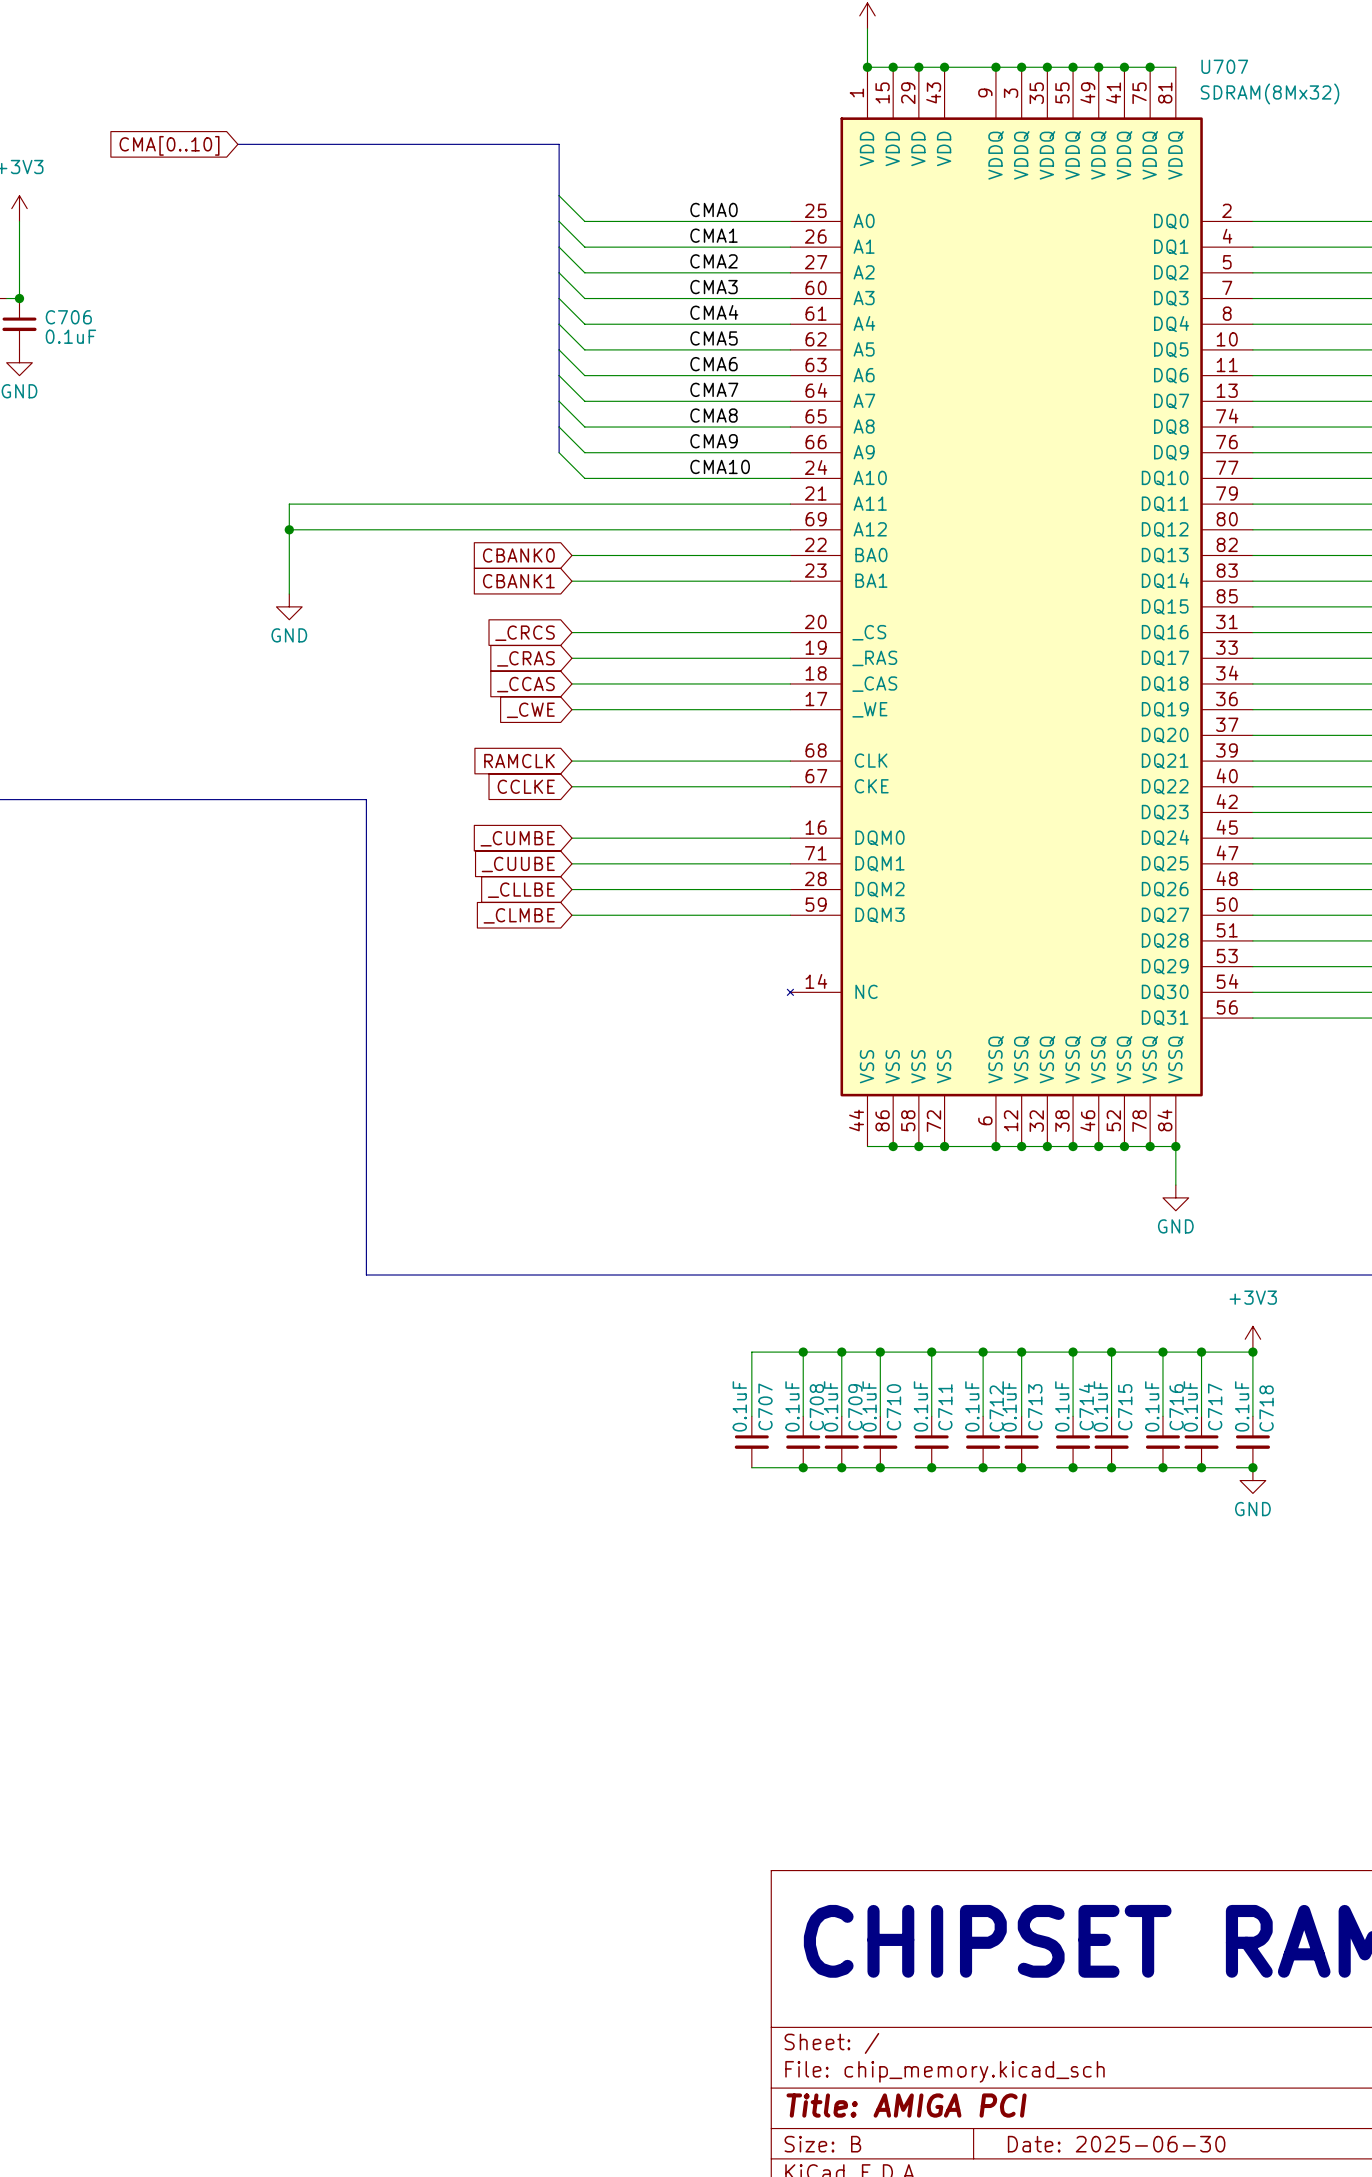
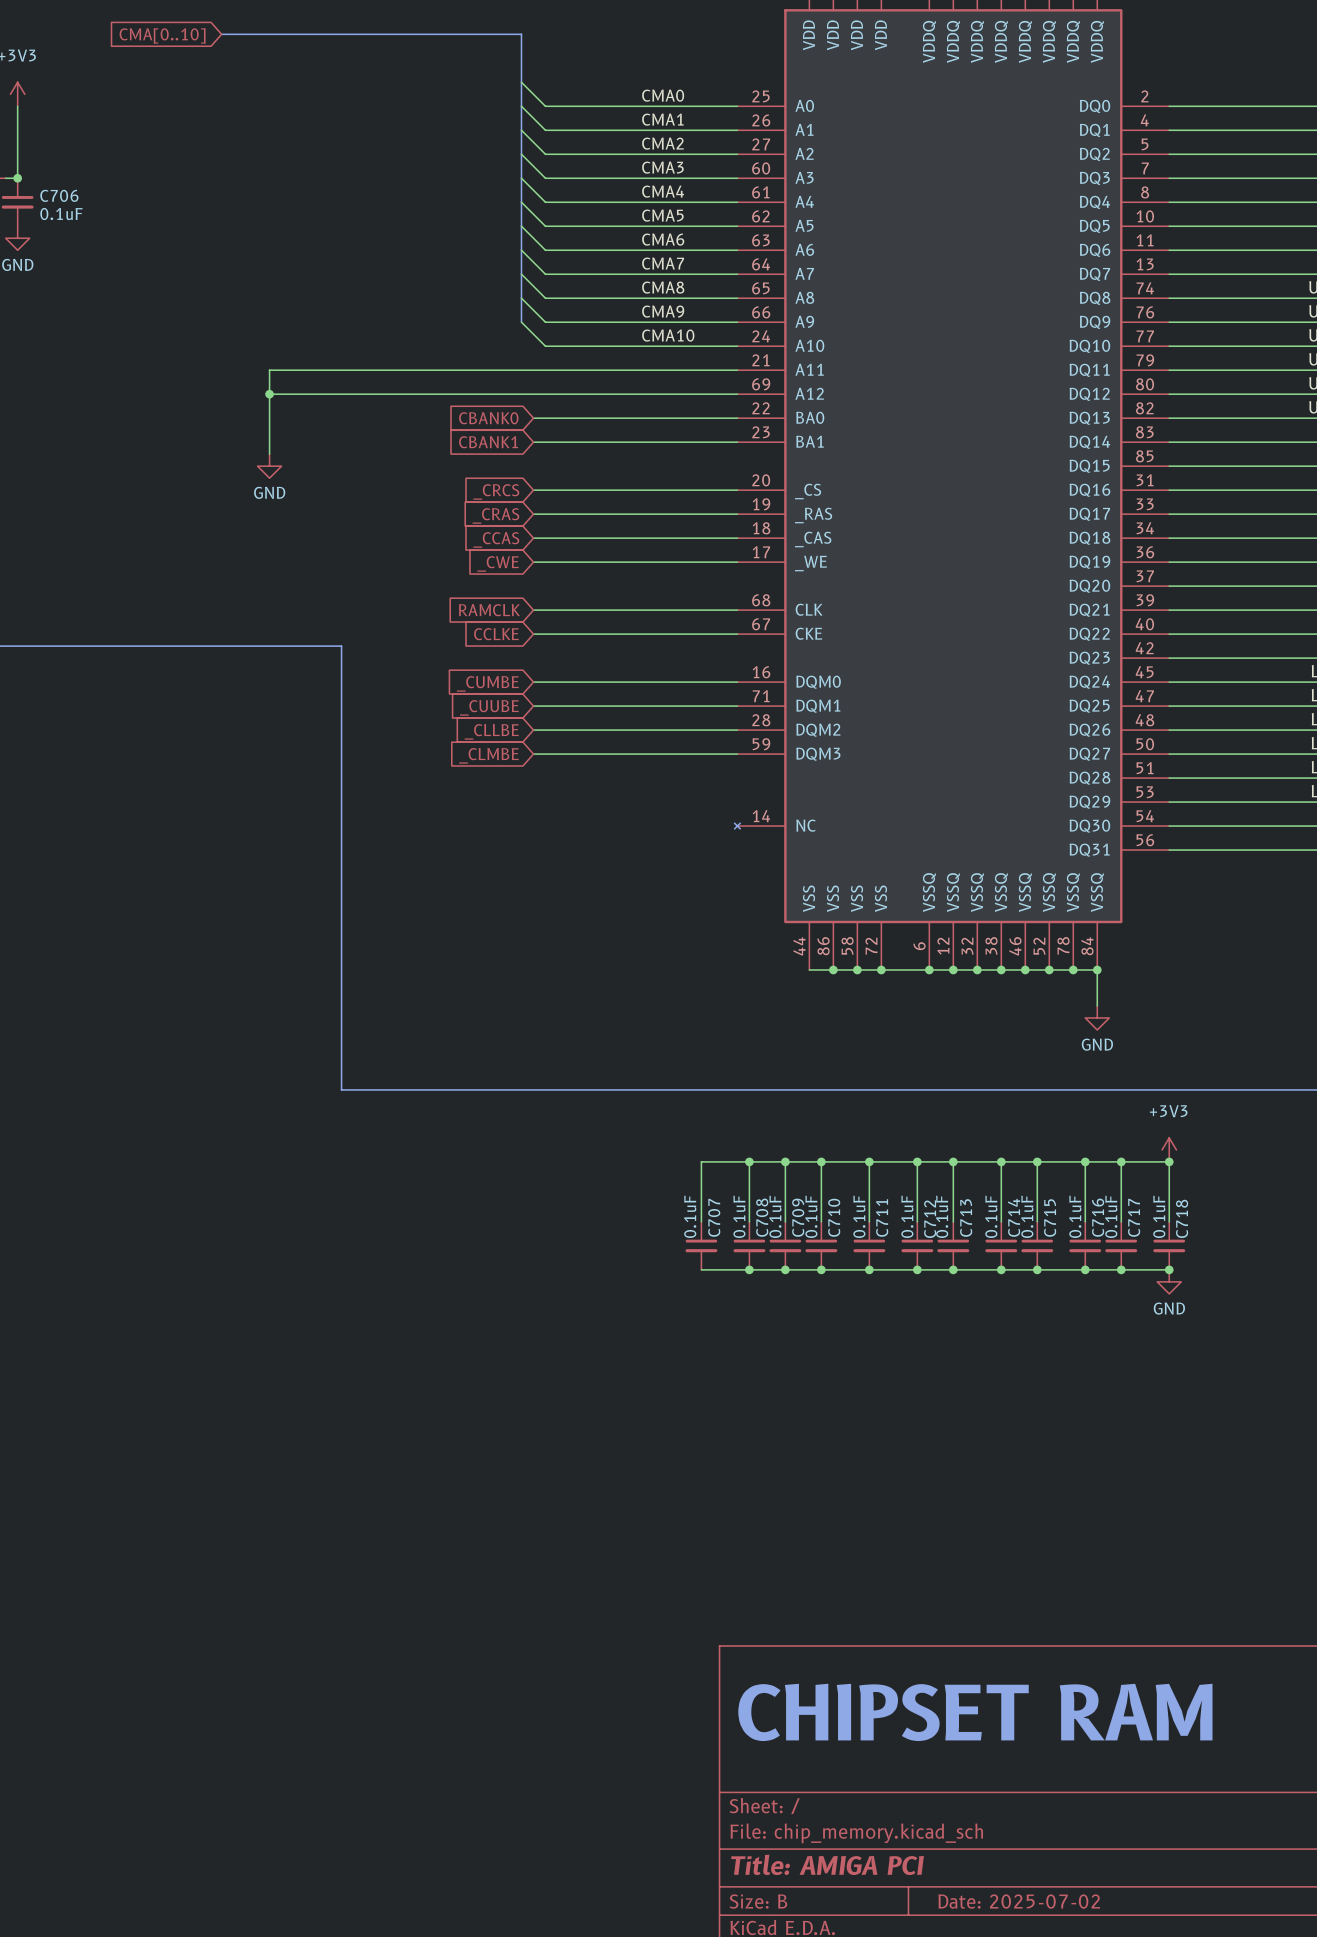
title block: Date: 2025-06-30 (1116, 2144) -> Date: 2025-07-02 (1019, 1901)

